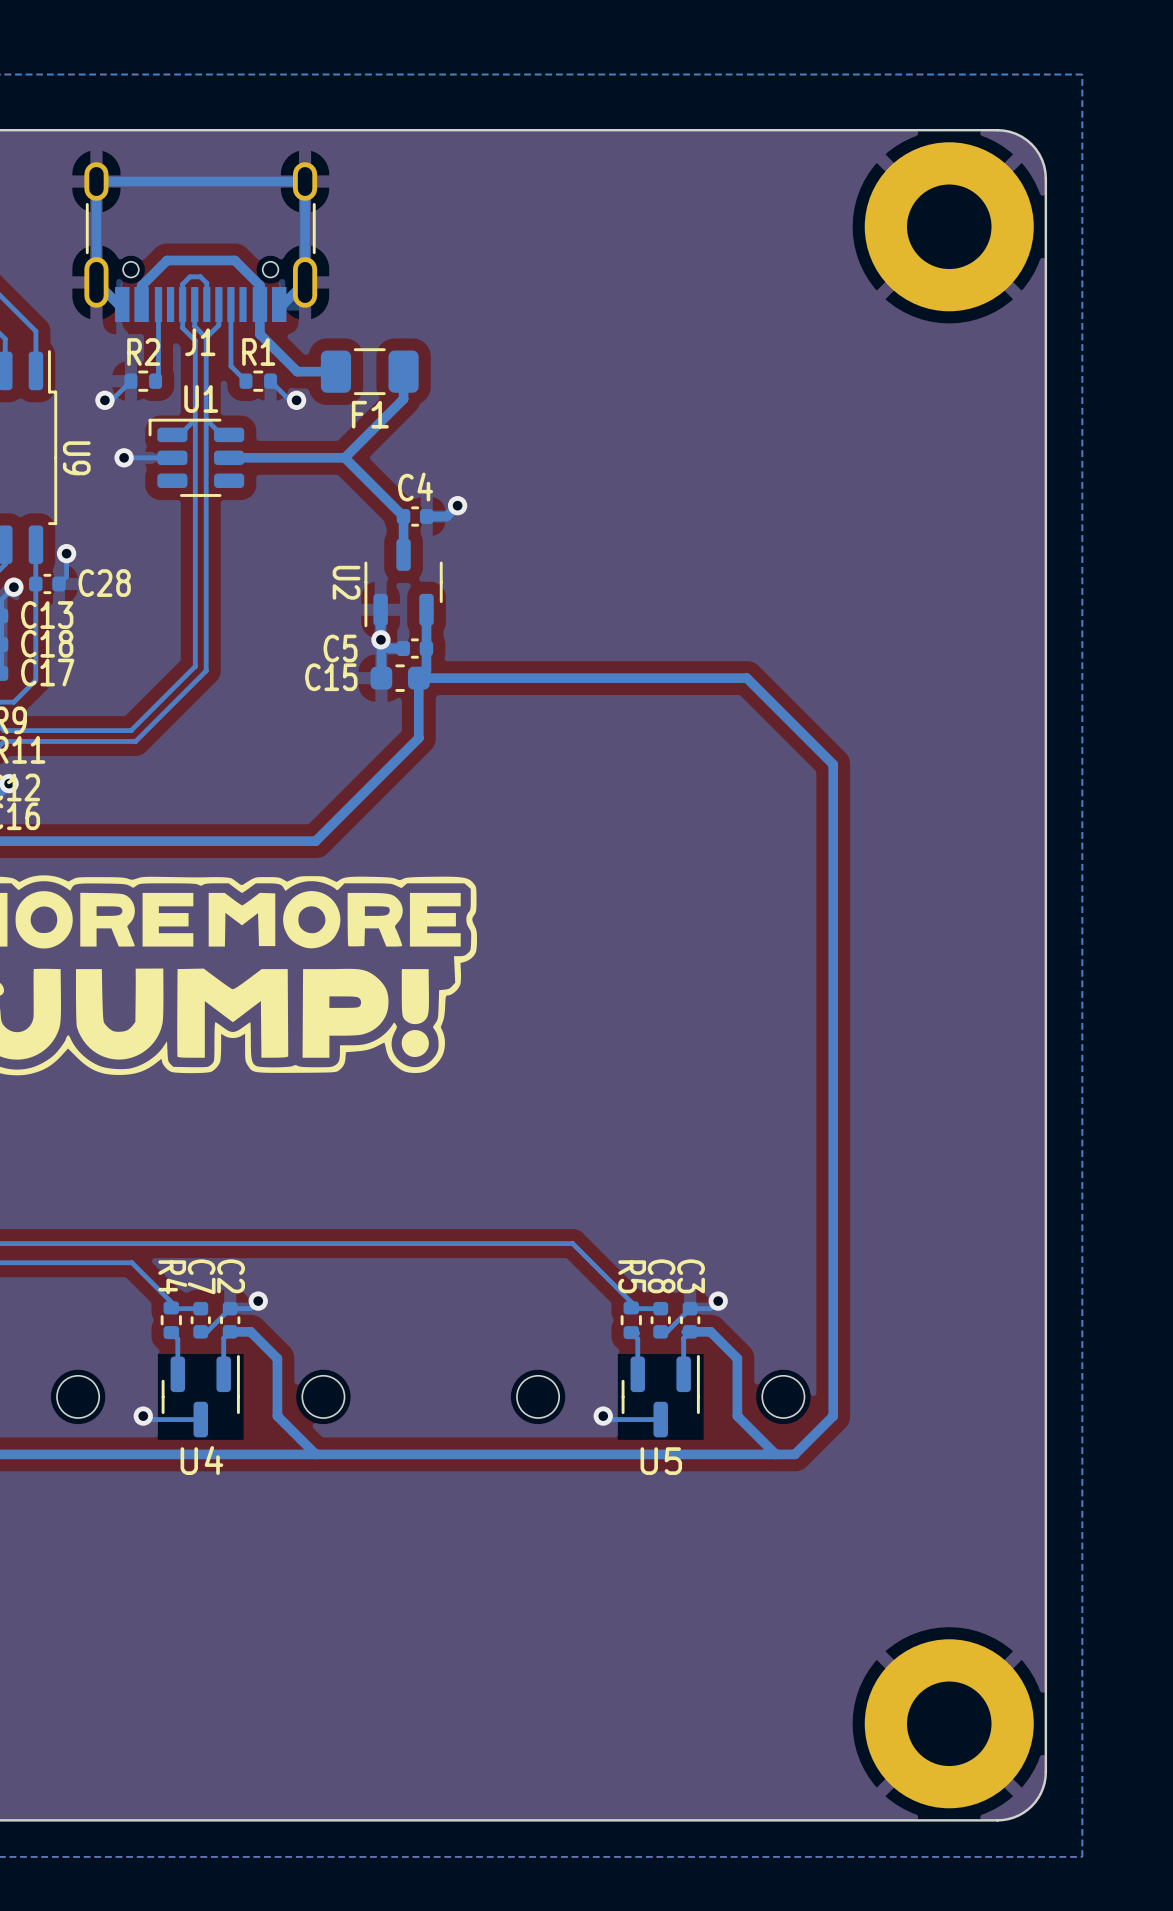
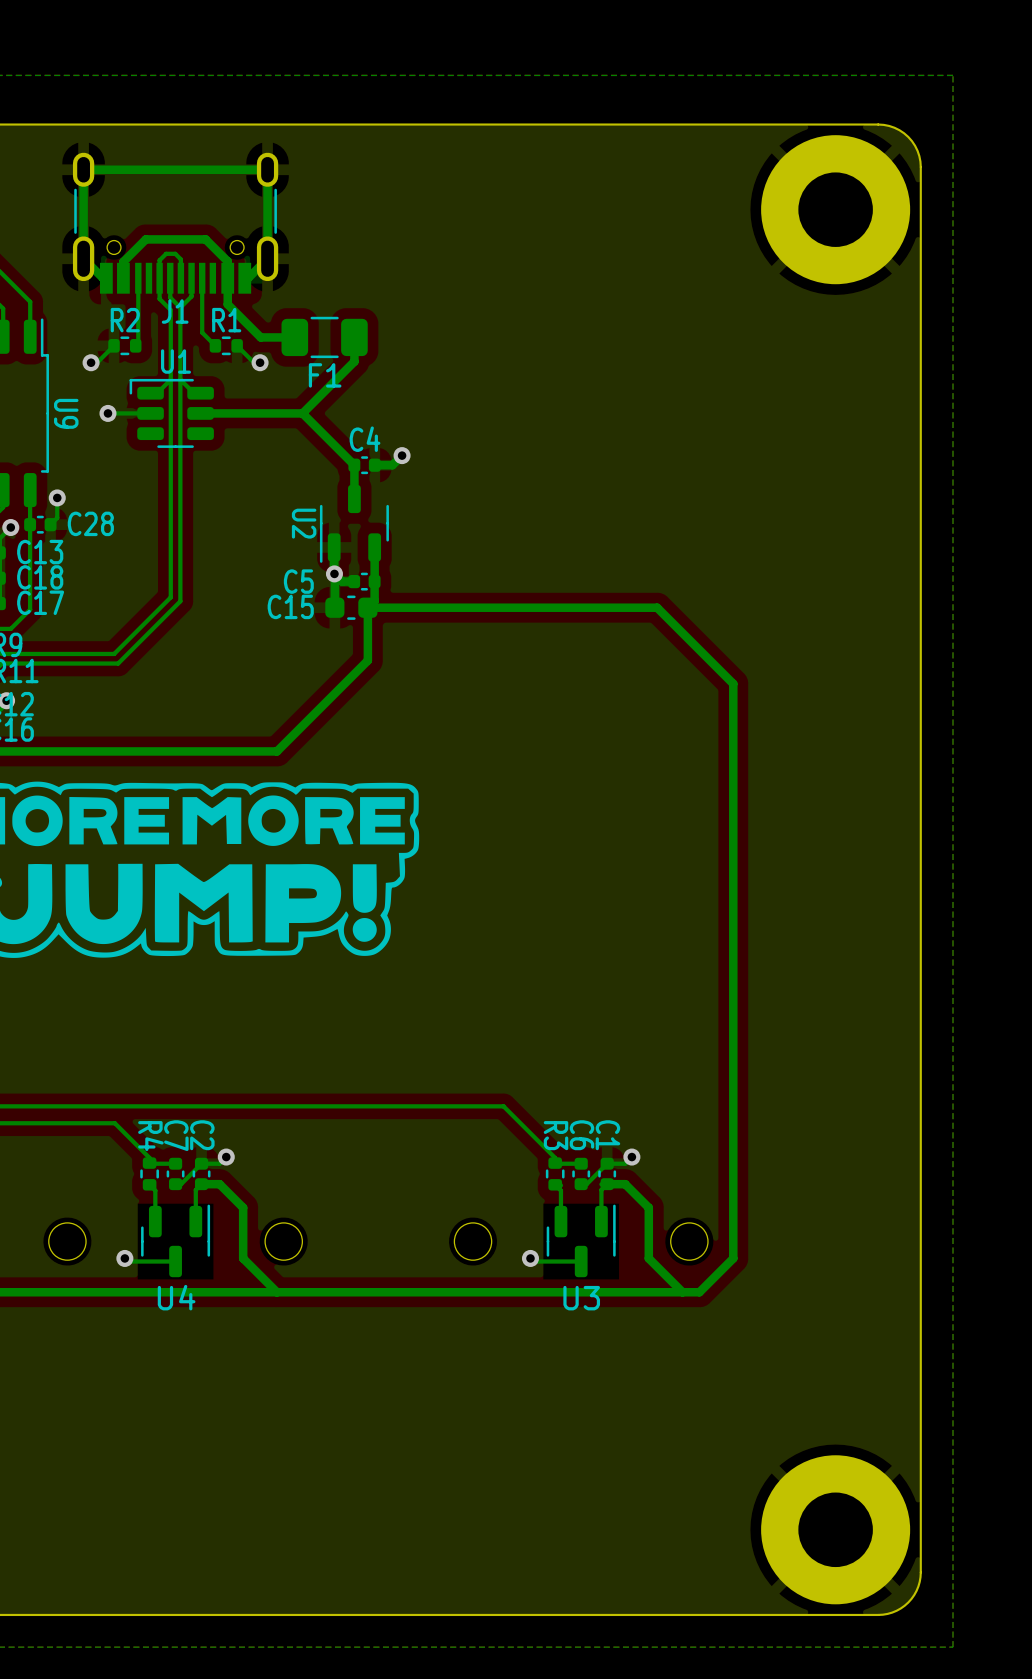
R5 name: R5 (632, 1276) -> R3 (556, 1135)
C8 name: C8 (661, 1276) -> C6 (581, 1135)
C3 name: C3 (691, 1276) -> C1 (607, 1135)
U5 name: U5 (661, 1461) -> U3 (581, 1298)

